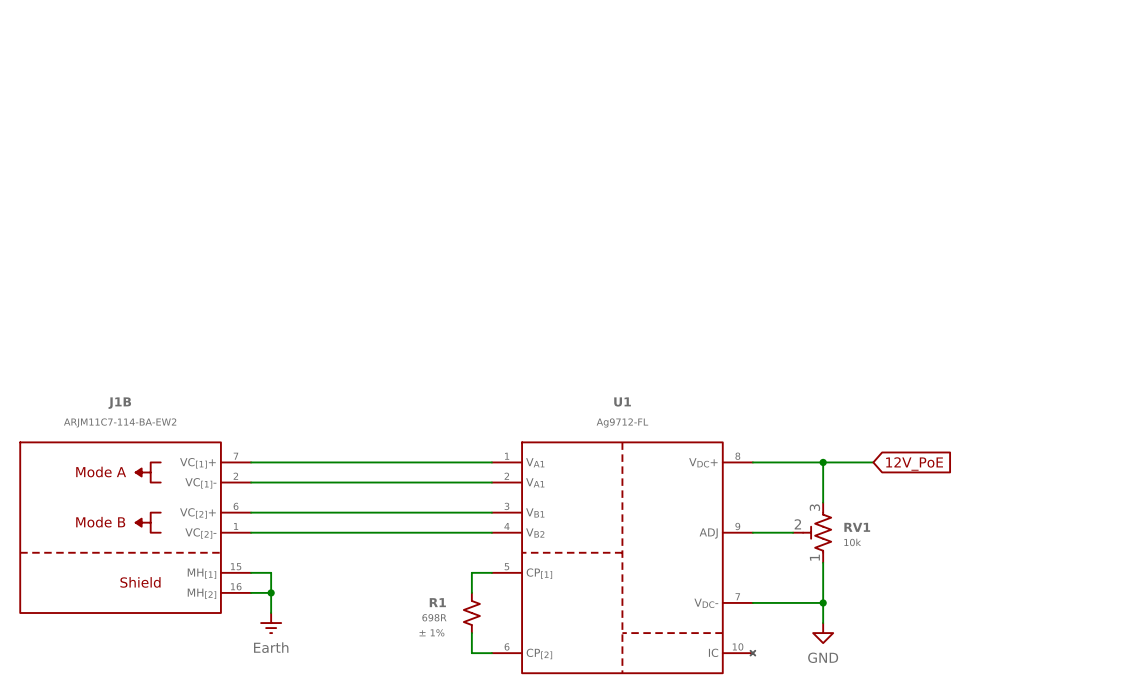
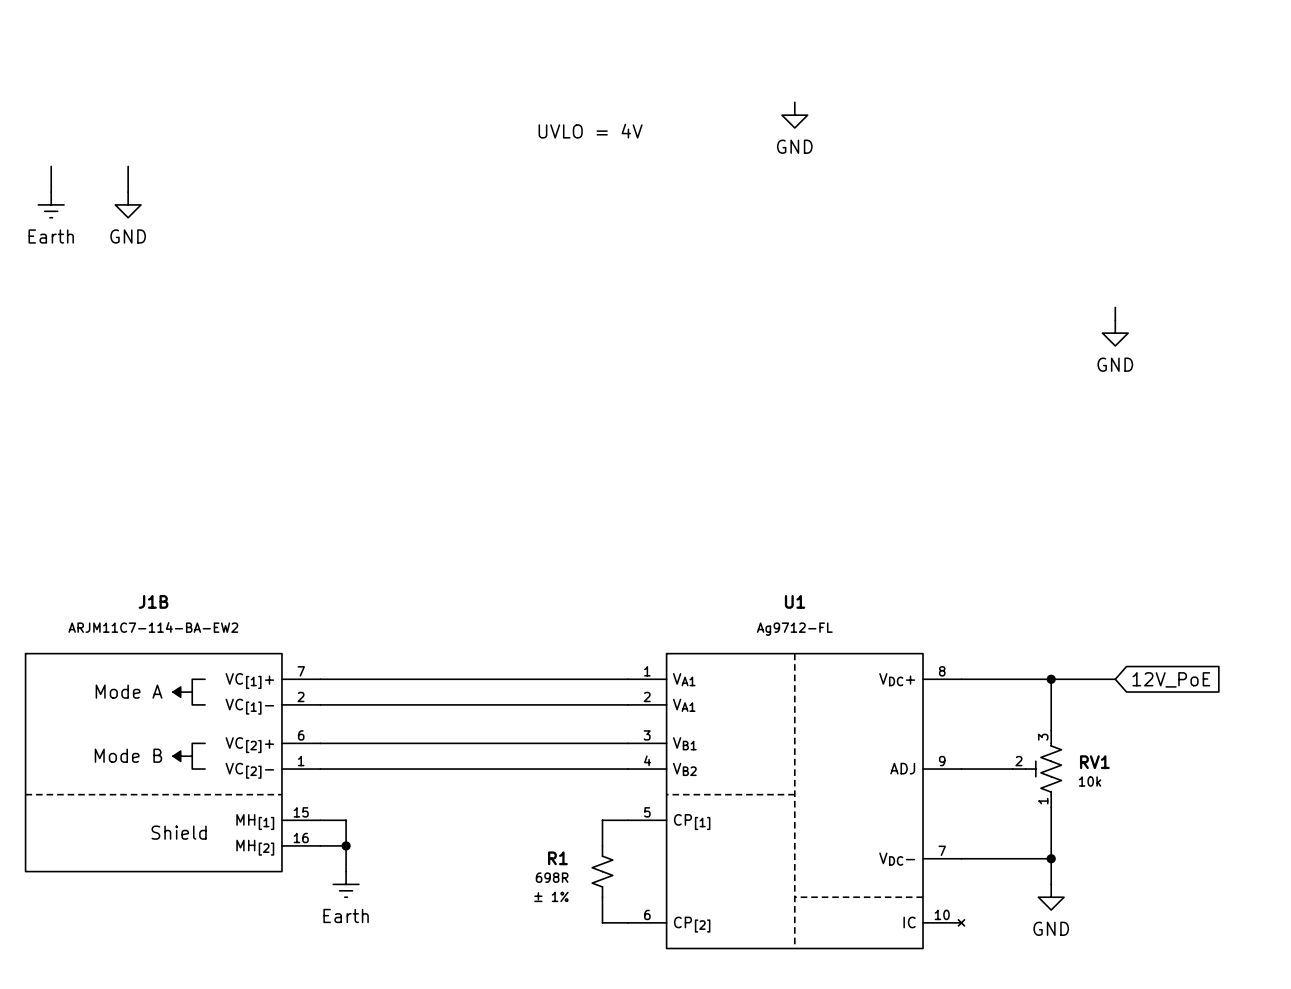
power symbol: none -> GND (794, 115)
text: none -> UVLO = 4V (590, 131)
wire: none -> (51, 166) (51, 192)
wire: none -> (128, 166) (128, 192)
power symbol: none -> Earth (51, 204)
power symbol: none -> GND (128, 204)
wire: none -> (1115, 307) (1115, 320)
power symbol: none -> GND (1115, 333)
RV1 symbol: [793, 502, 832, 563] -> [1012, 730, 1062, 808]

